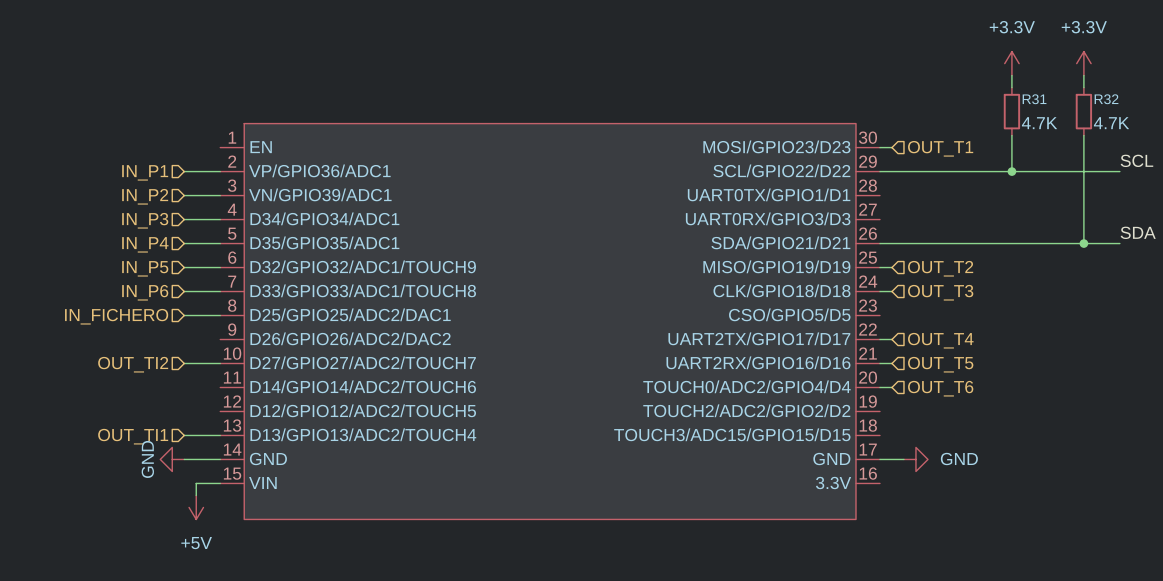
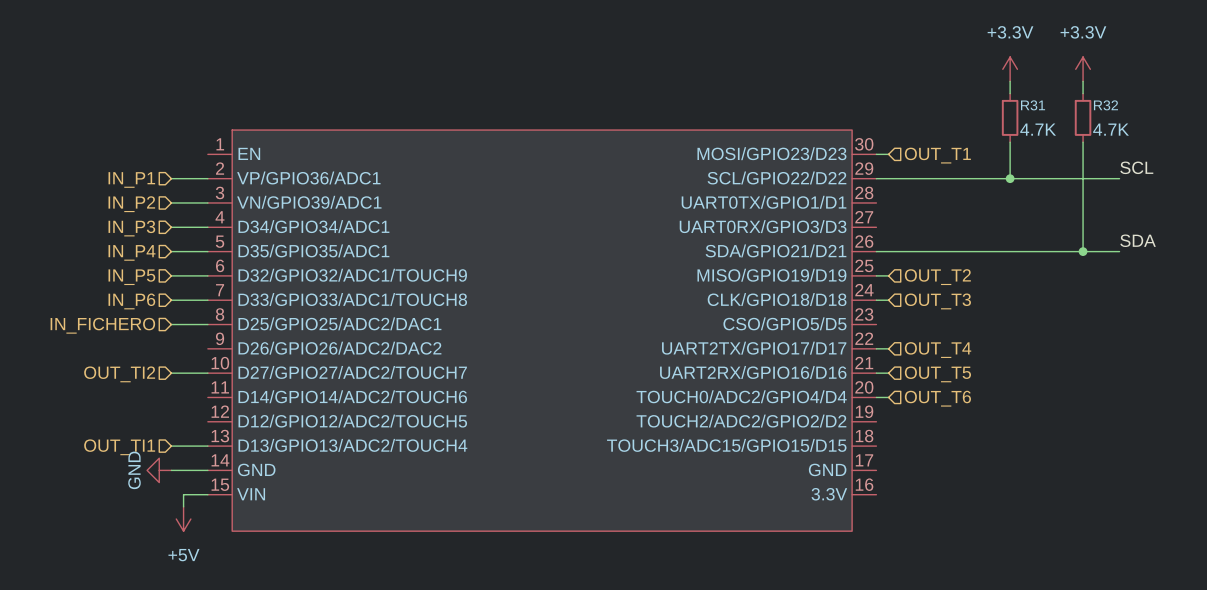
wire: (879, 459) (903, 459) -> none
power symbol: GND (915, 459) -> none

